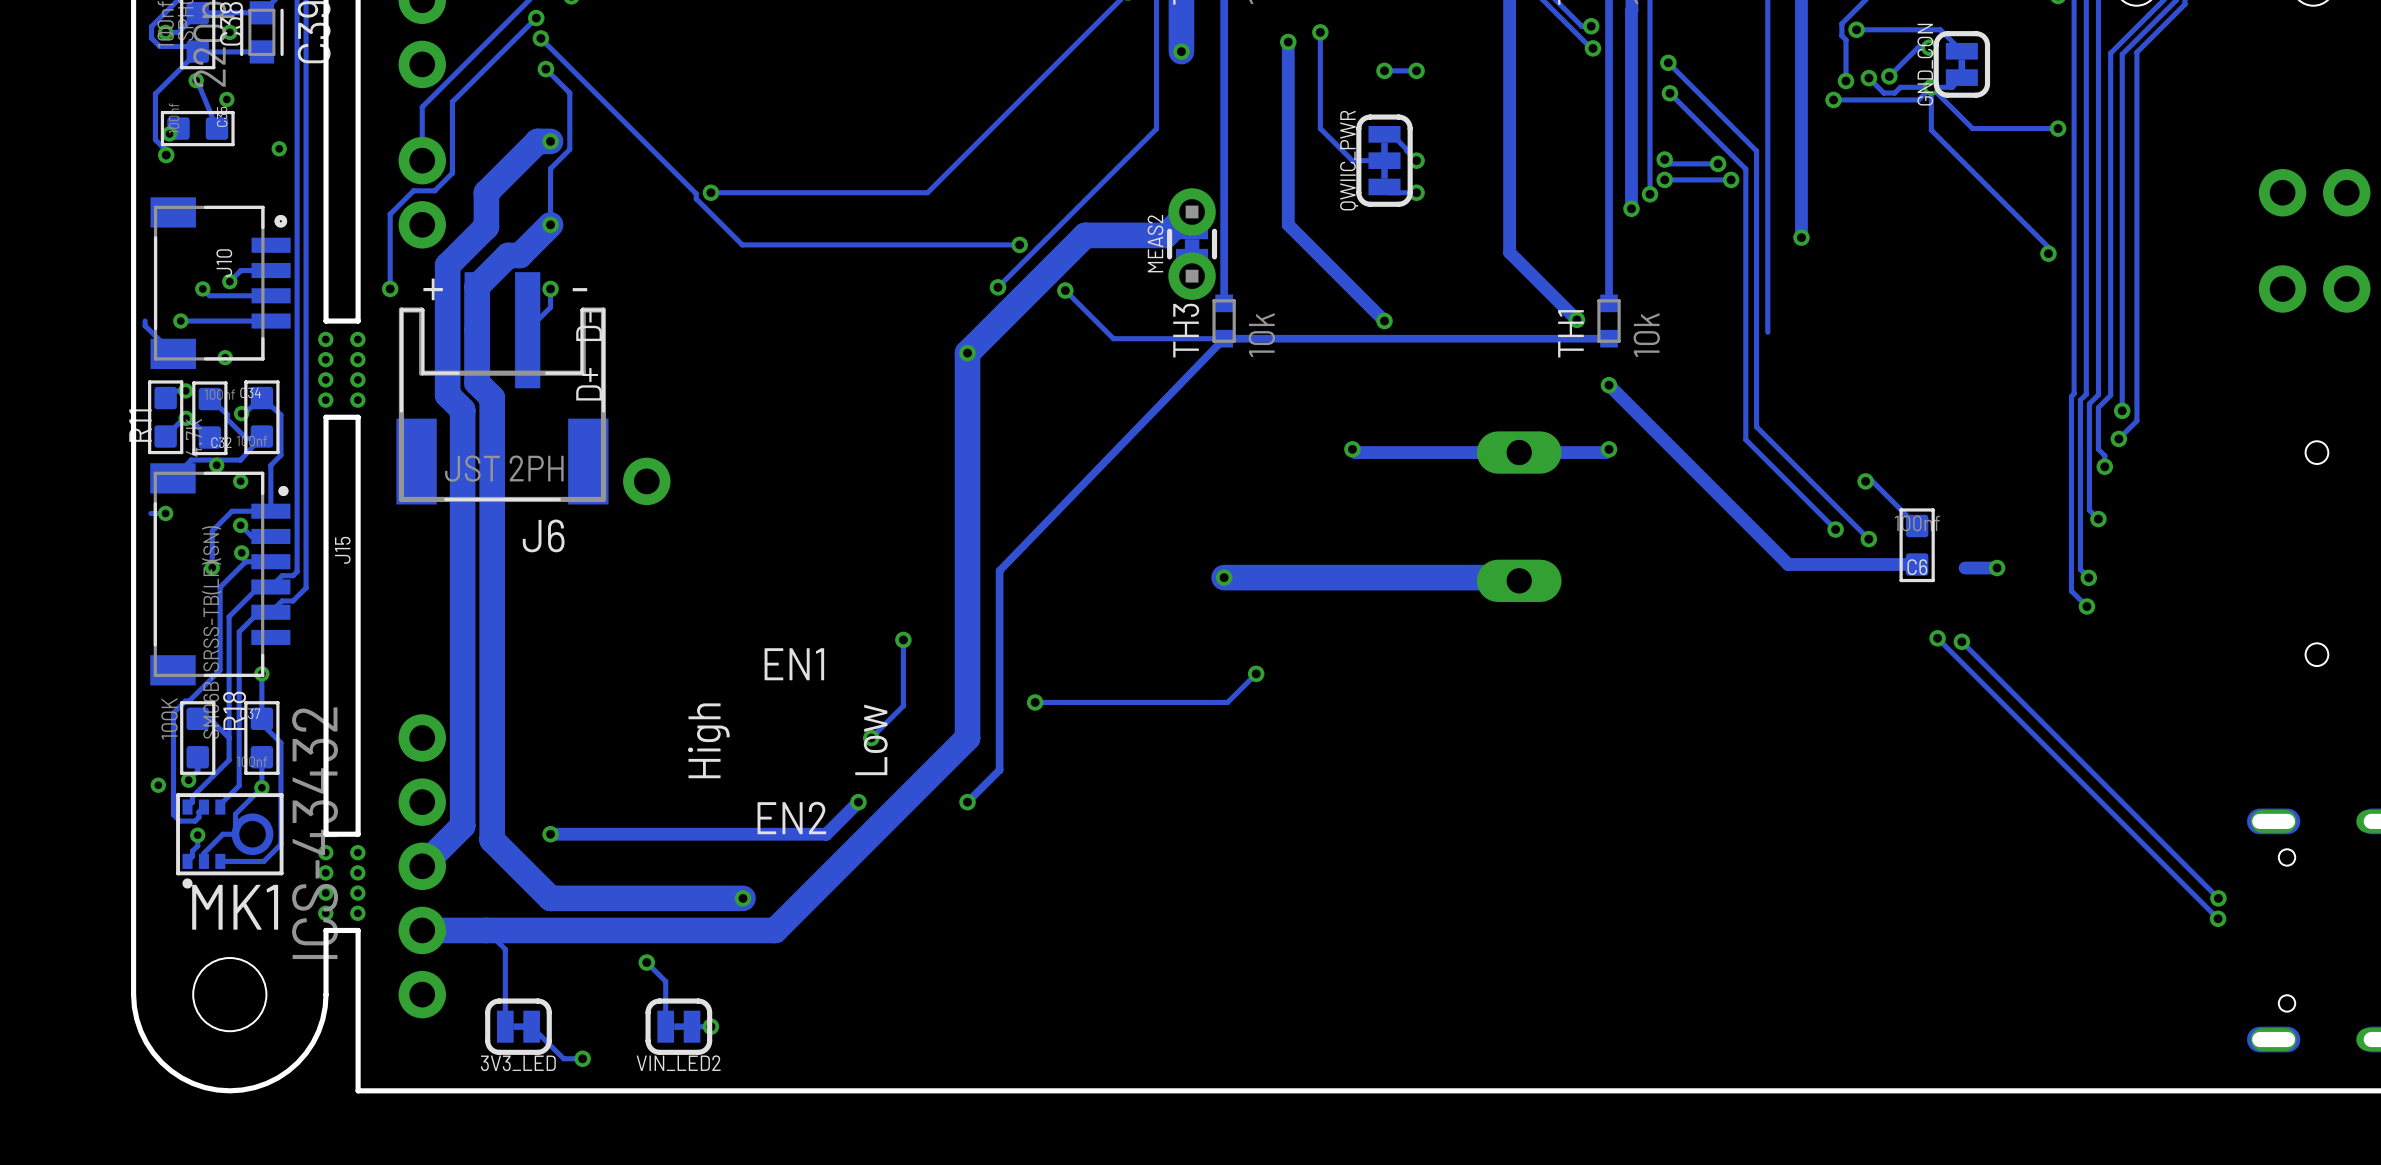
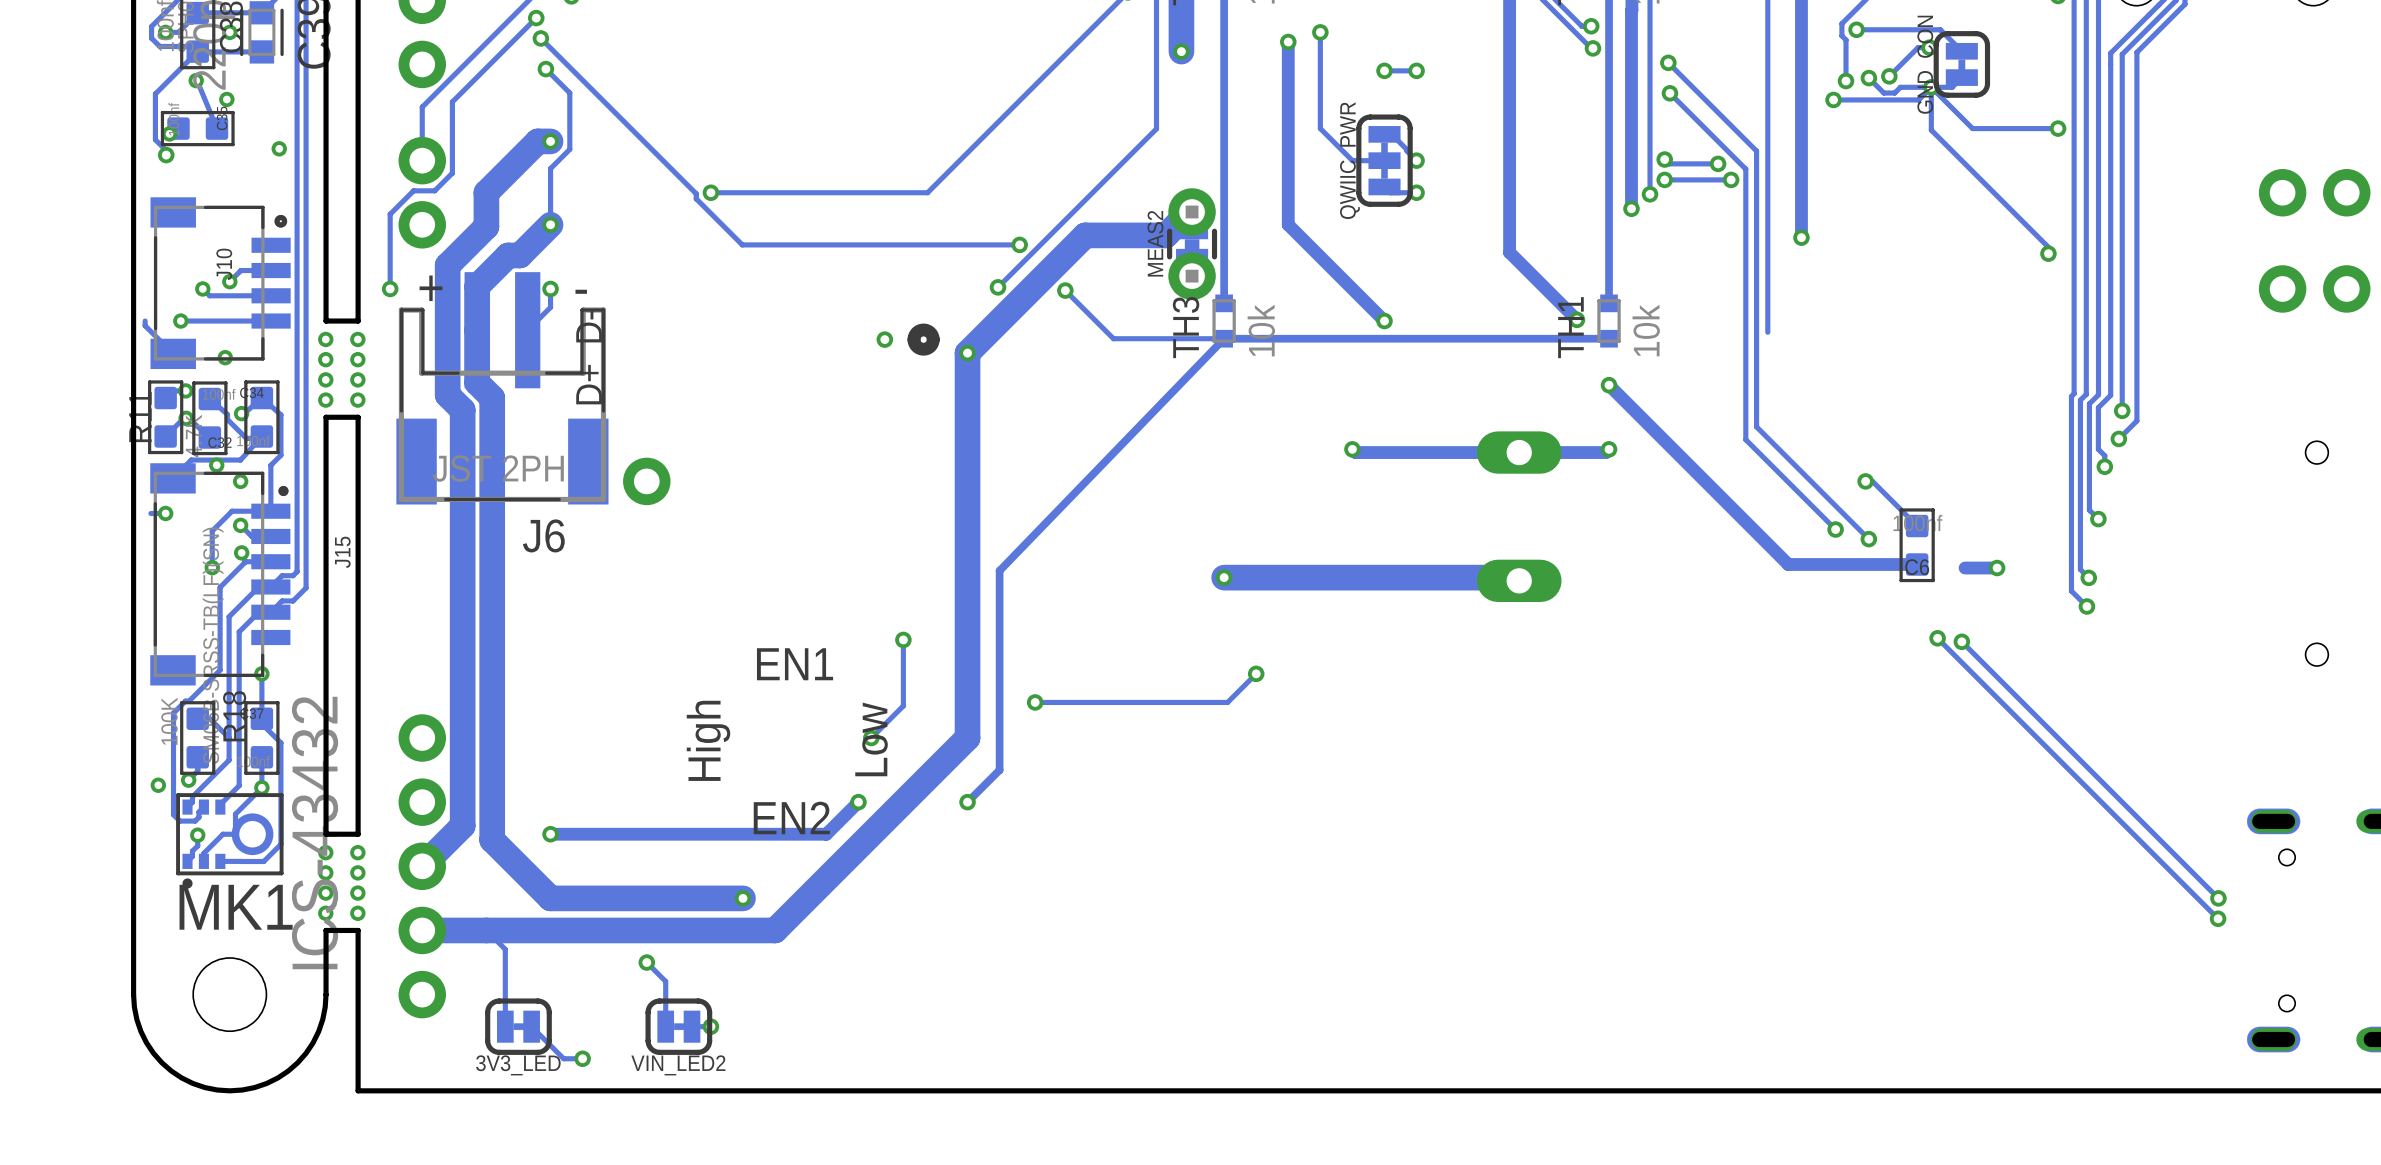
via: none -> (884, 339)
part: none -> (923, 339)

